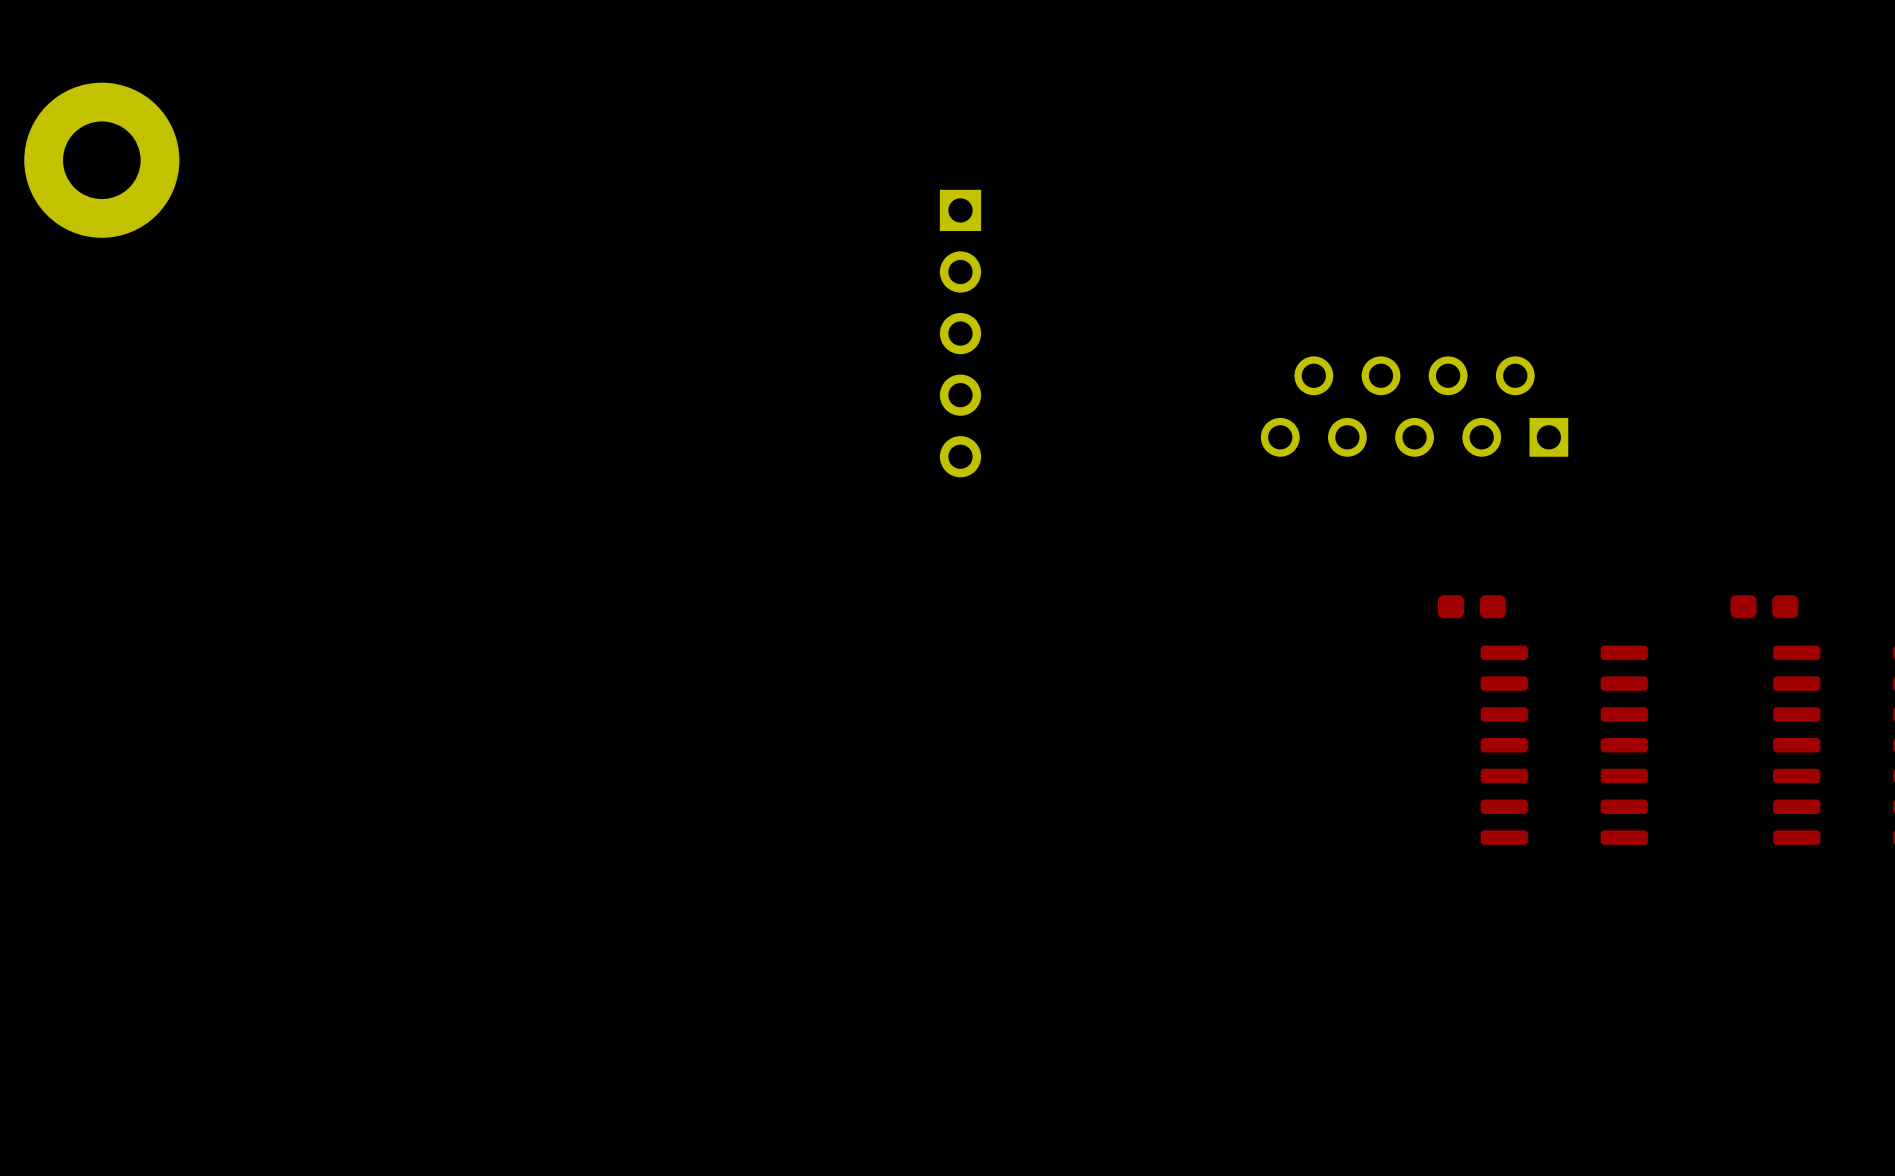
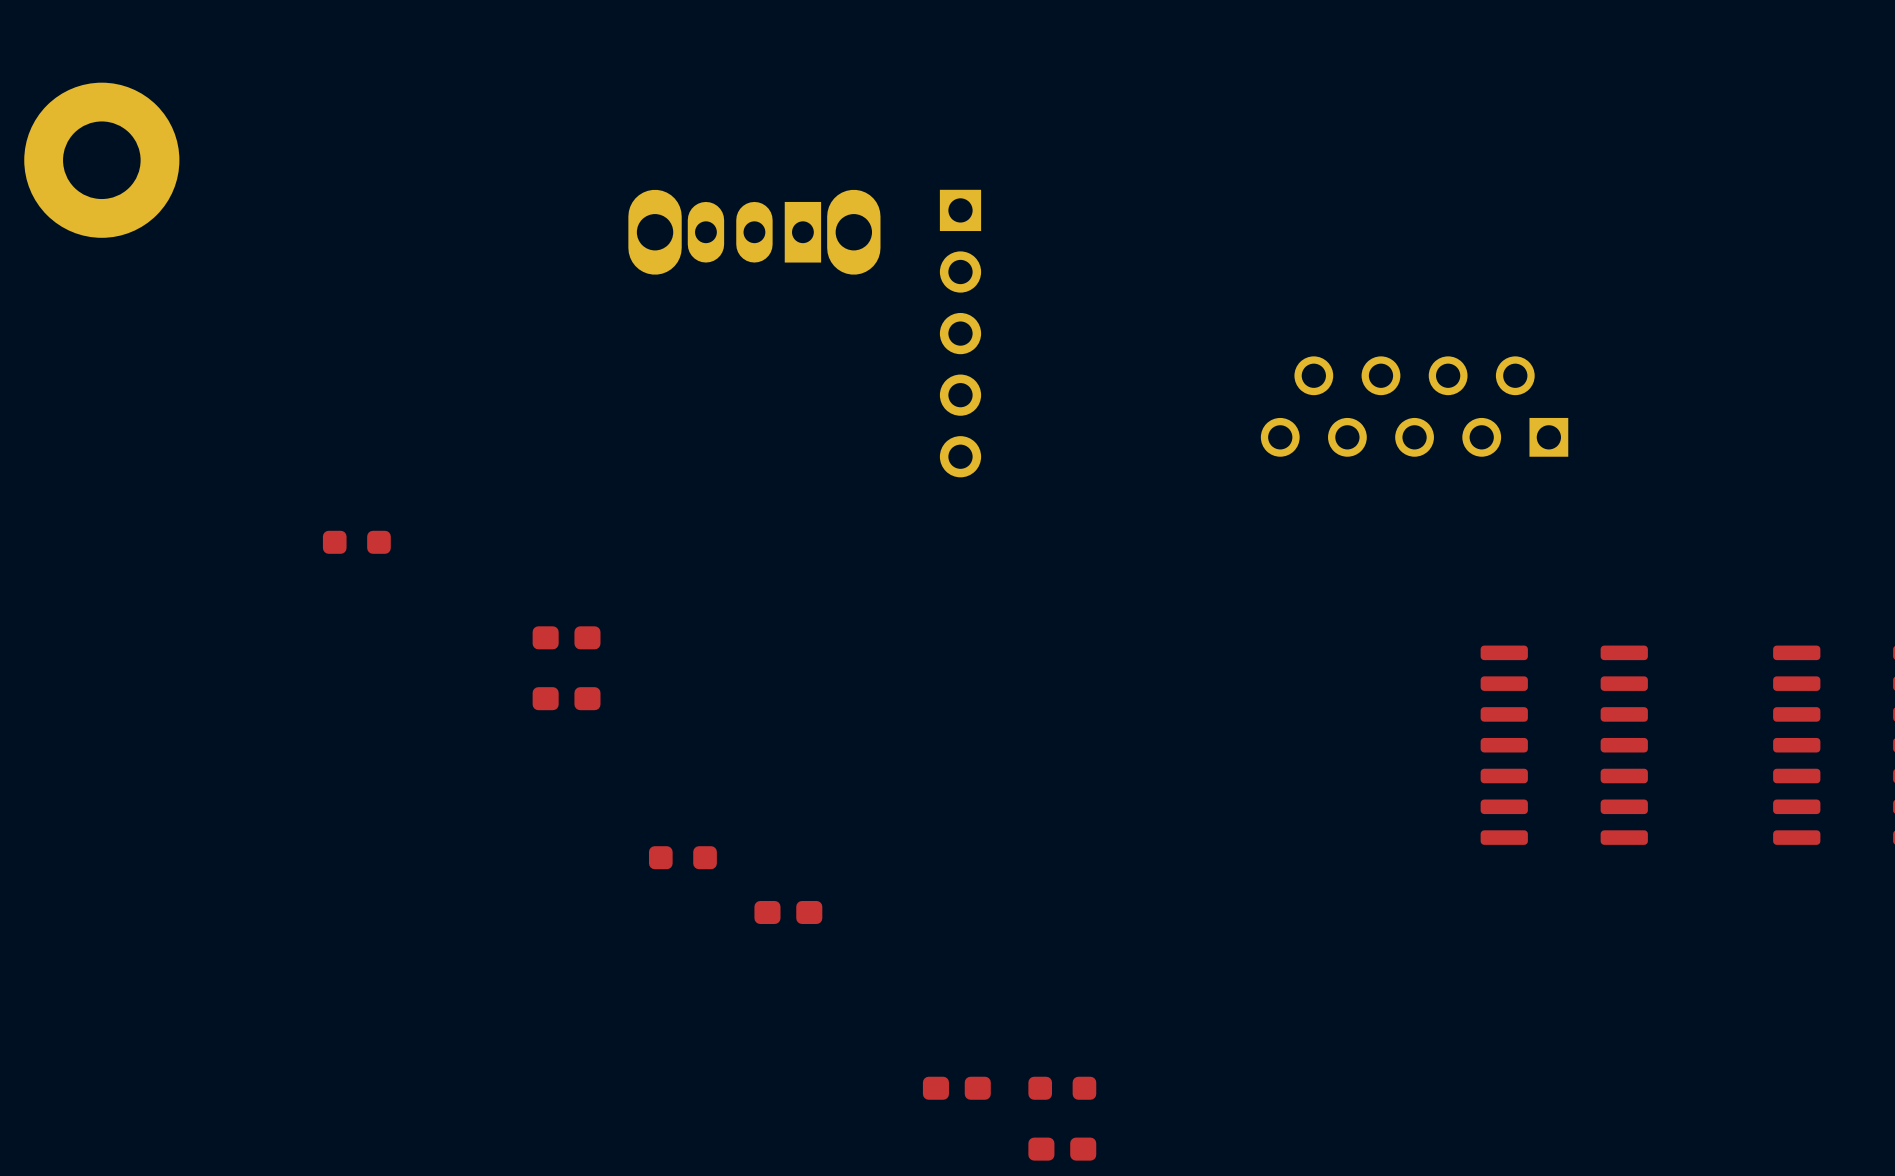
part: none -> (754, 232)
part: none -> (356, 542)
part: (1471, 606) -> none
part: (1764, 606) -> none
part: none -> (566, 637)
part: none -> (566, 698)
part: none -> (682, 857)
part: none -> (788, 912)
part: none -> (956, 1088)
part: none -> (1062, 1088)
part: none -> (1062, 1149)

